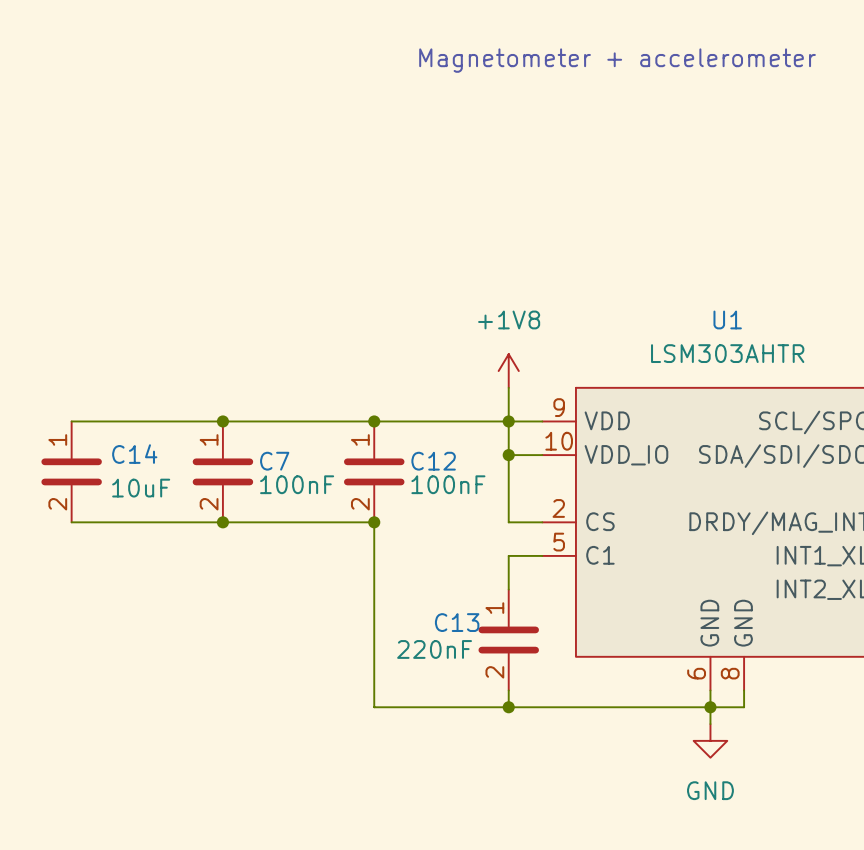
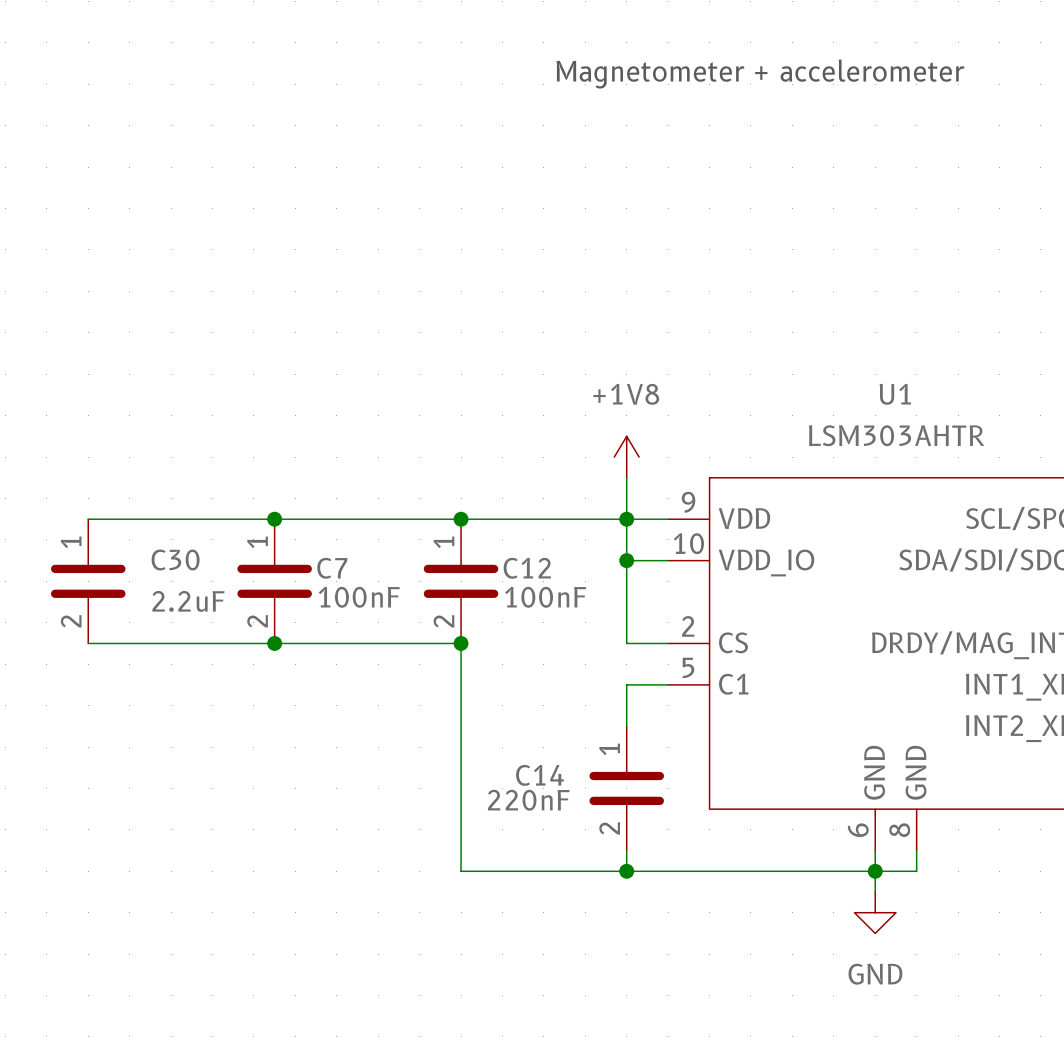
C14 name: C14 (134, 454) -> C30 (175, 560)
C14 text: 10uF (141, 488) -> 2.2uF (188, 601)
C13 name: C13 (457, 622) -> C14 (540, 775)

